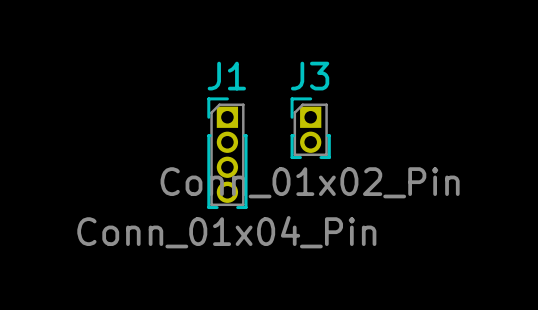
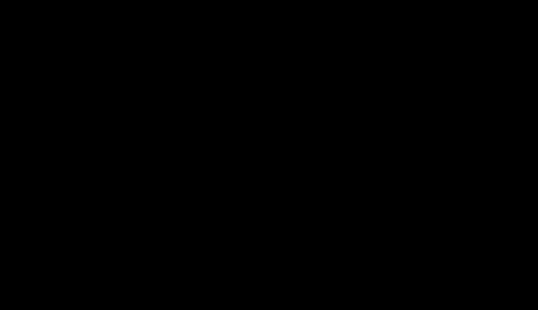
J3: Conn_01x02_Pin (310, 128) -> none
J1: Conn_01x04_Pin (227, 153) -> none

